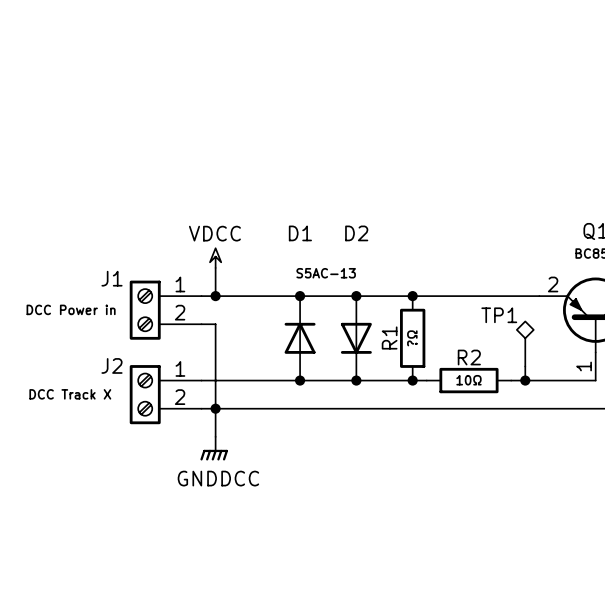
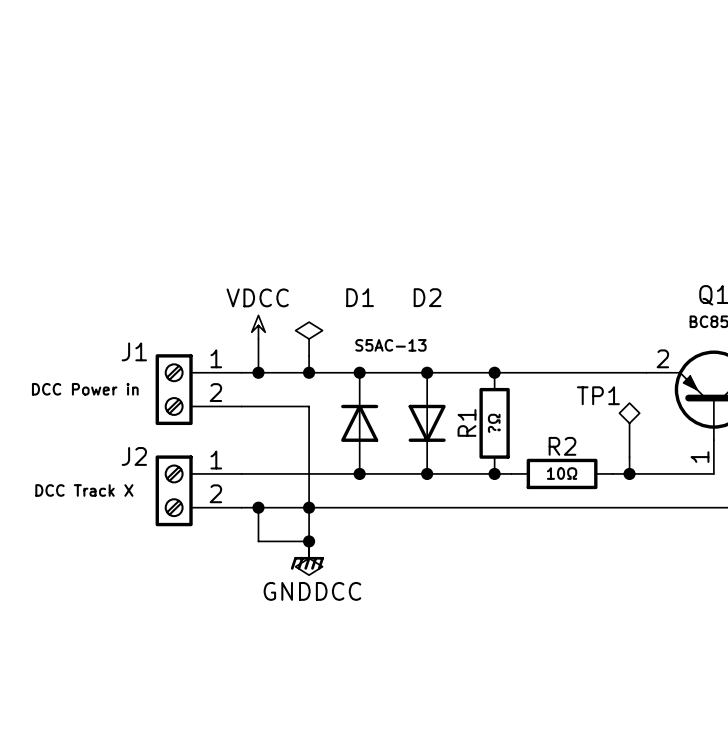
power symbol: none -> (309, 339)
wire: none -> (309, 355) (309, 372)
junction: none -> (309, 372)
wire: (215, 324) (215, 408) -> (258, 406) (309, 406) (309, 541) (258, 541)
junction: none -> (309, 507)
junction: none -> (309, 541)
power symbol position: GNDDCC (214, 448) -> GNDDCC (307, 555)
power symbol: none -> (309, 558)

